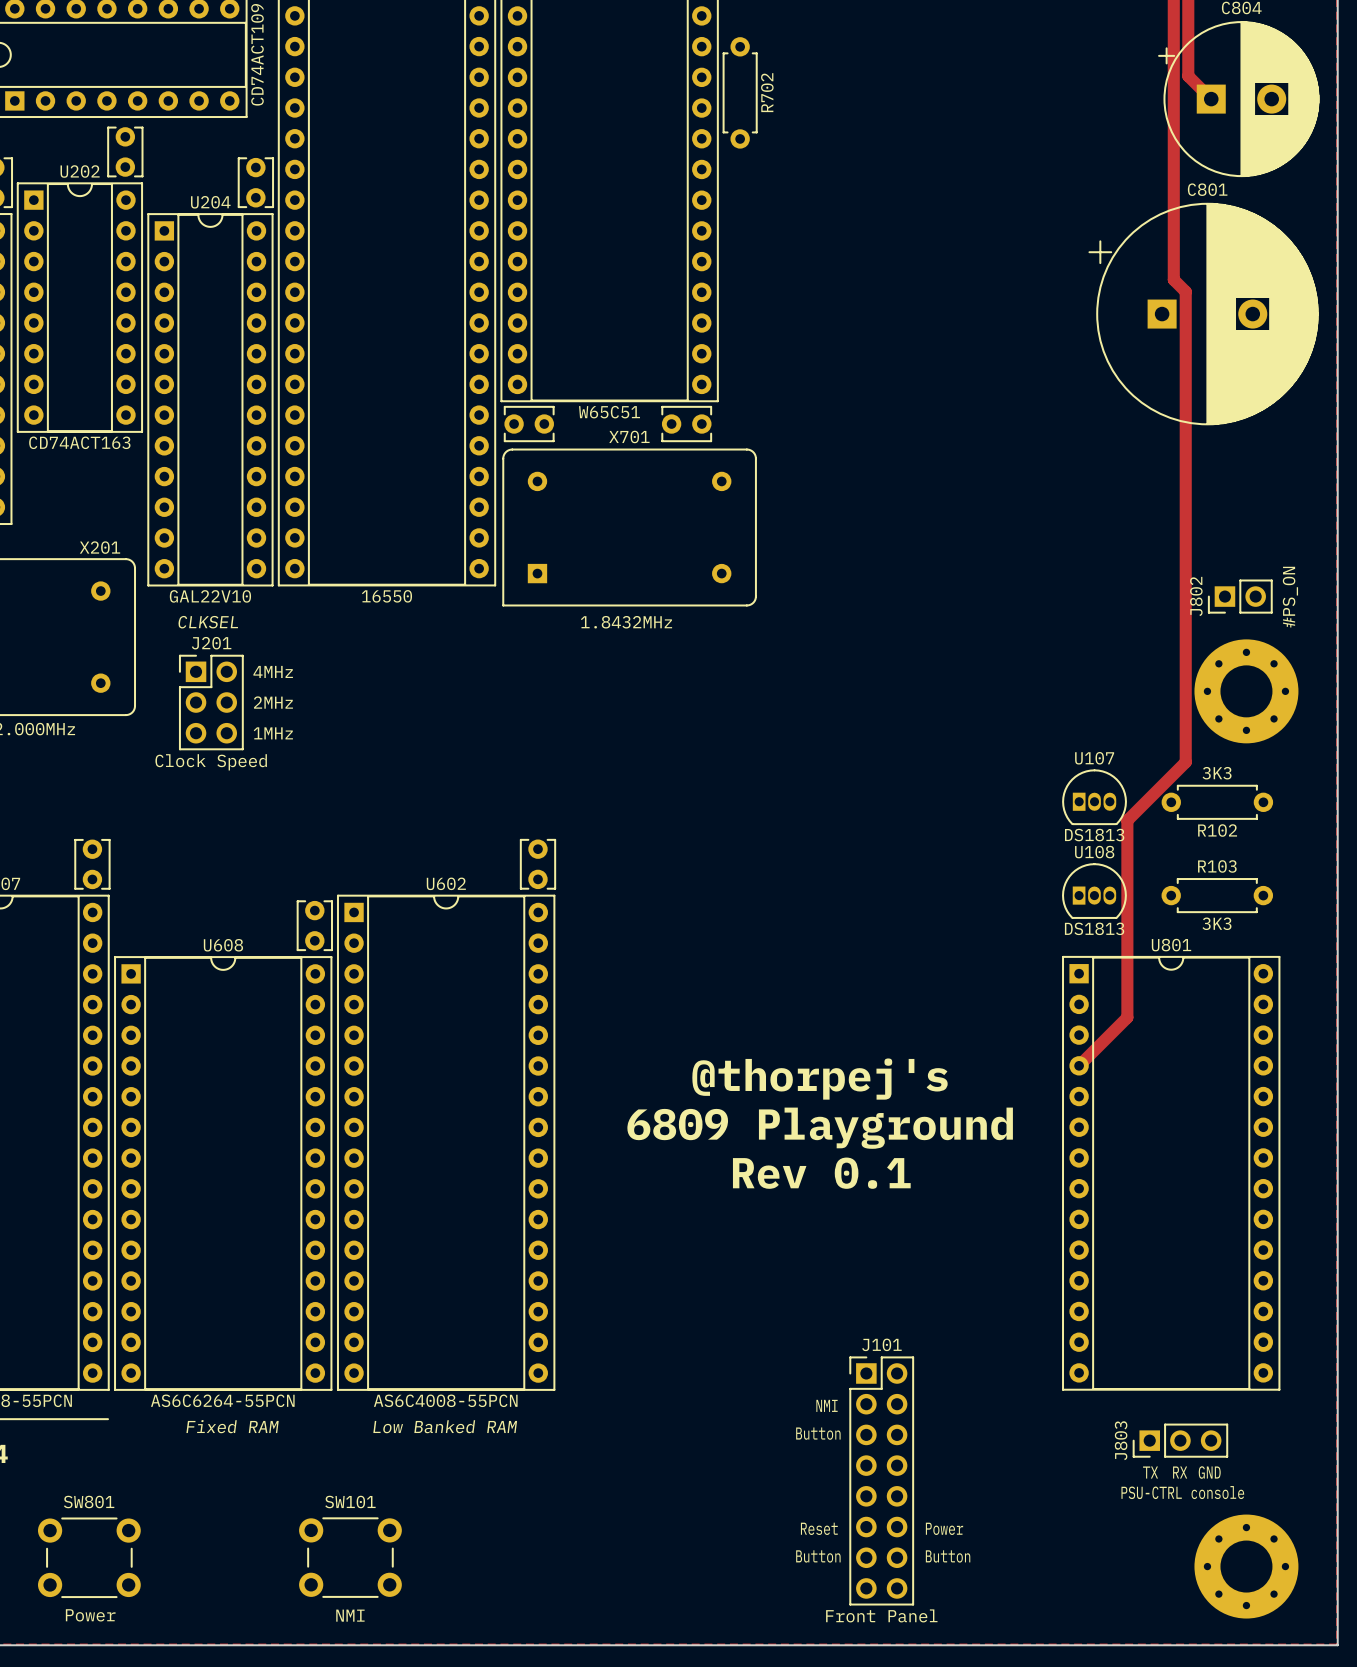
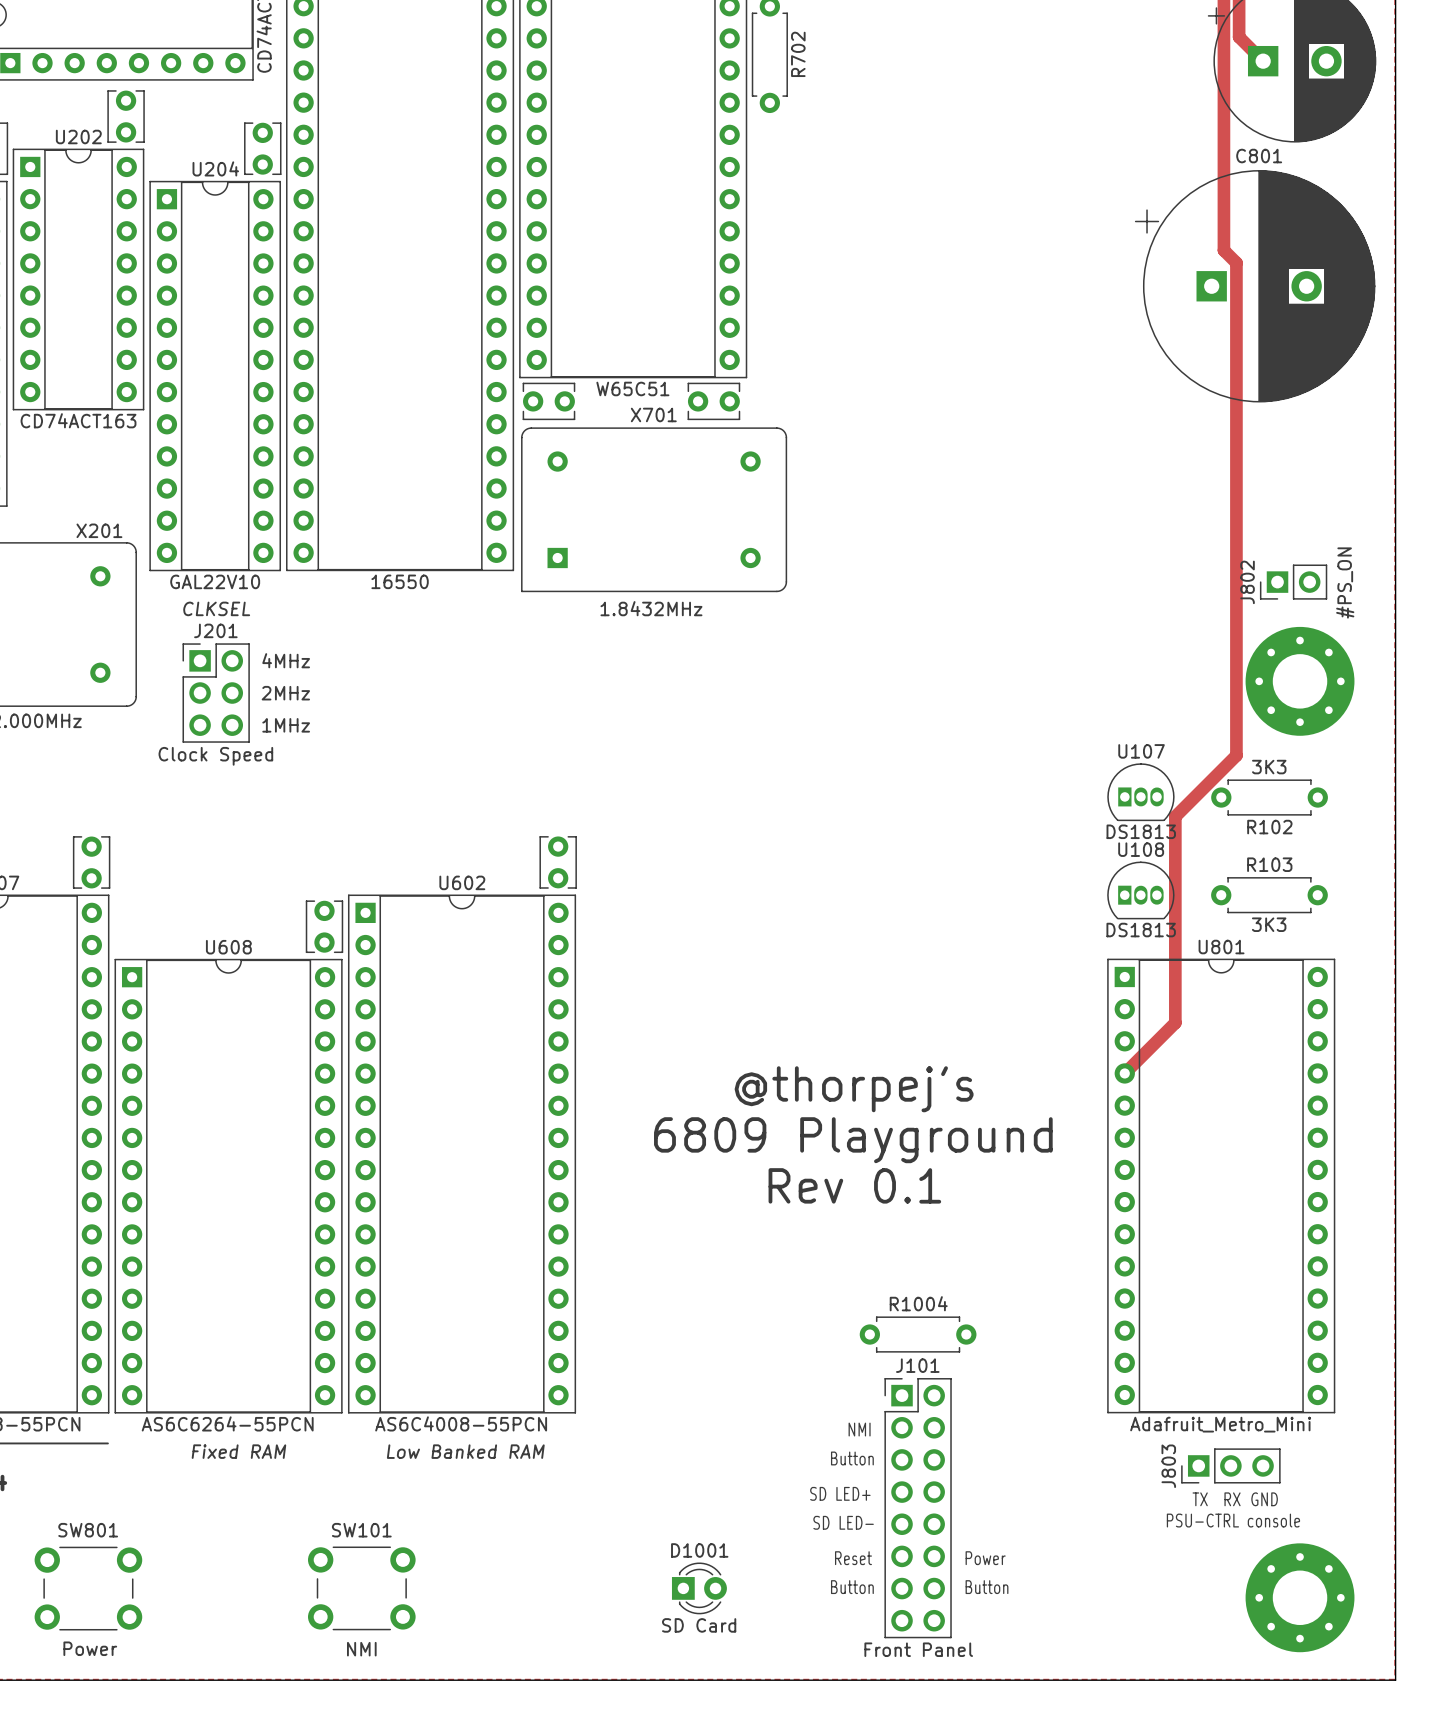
R1004: none -> (918, 1334)
U801 value: none -> Adafruit_Metro_Mini (1220, 1424)
text: none -> SD LED+ (840, 1493)
text: none -> SD LED- (843, 1522)
D1001: none -> SD Card (699, 1588)

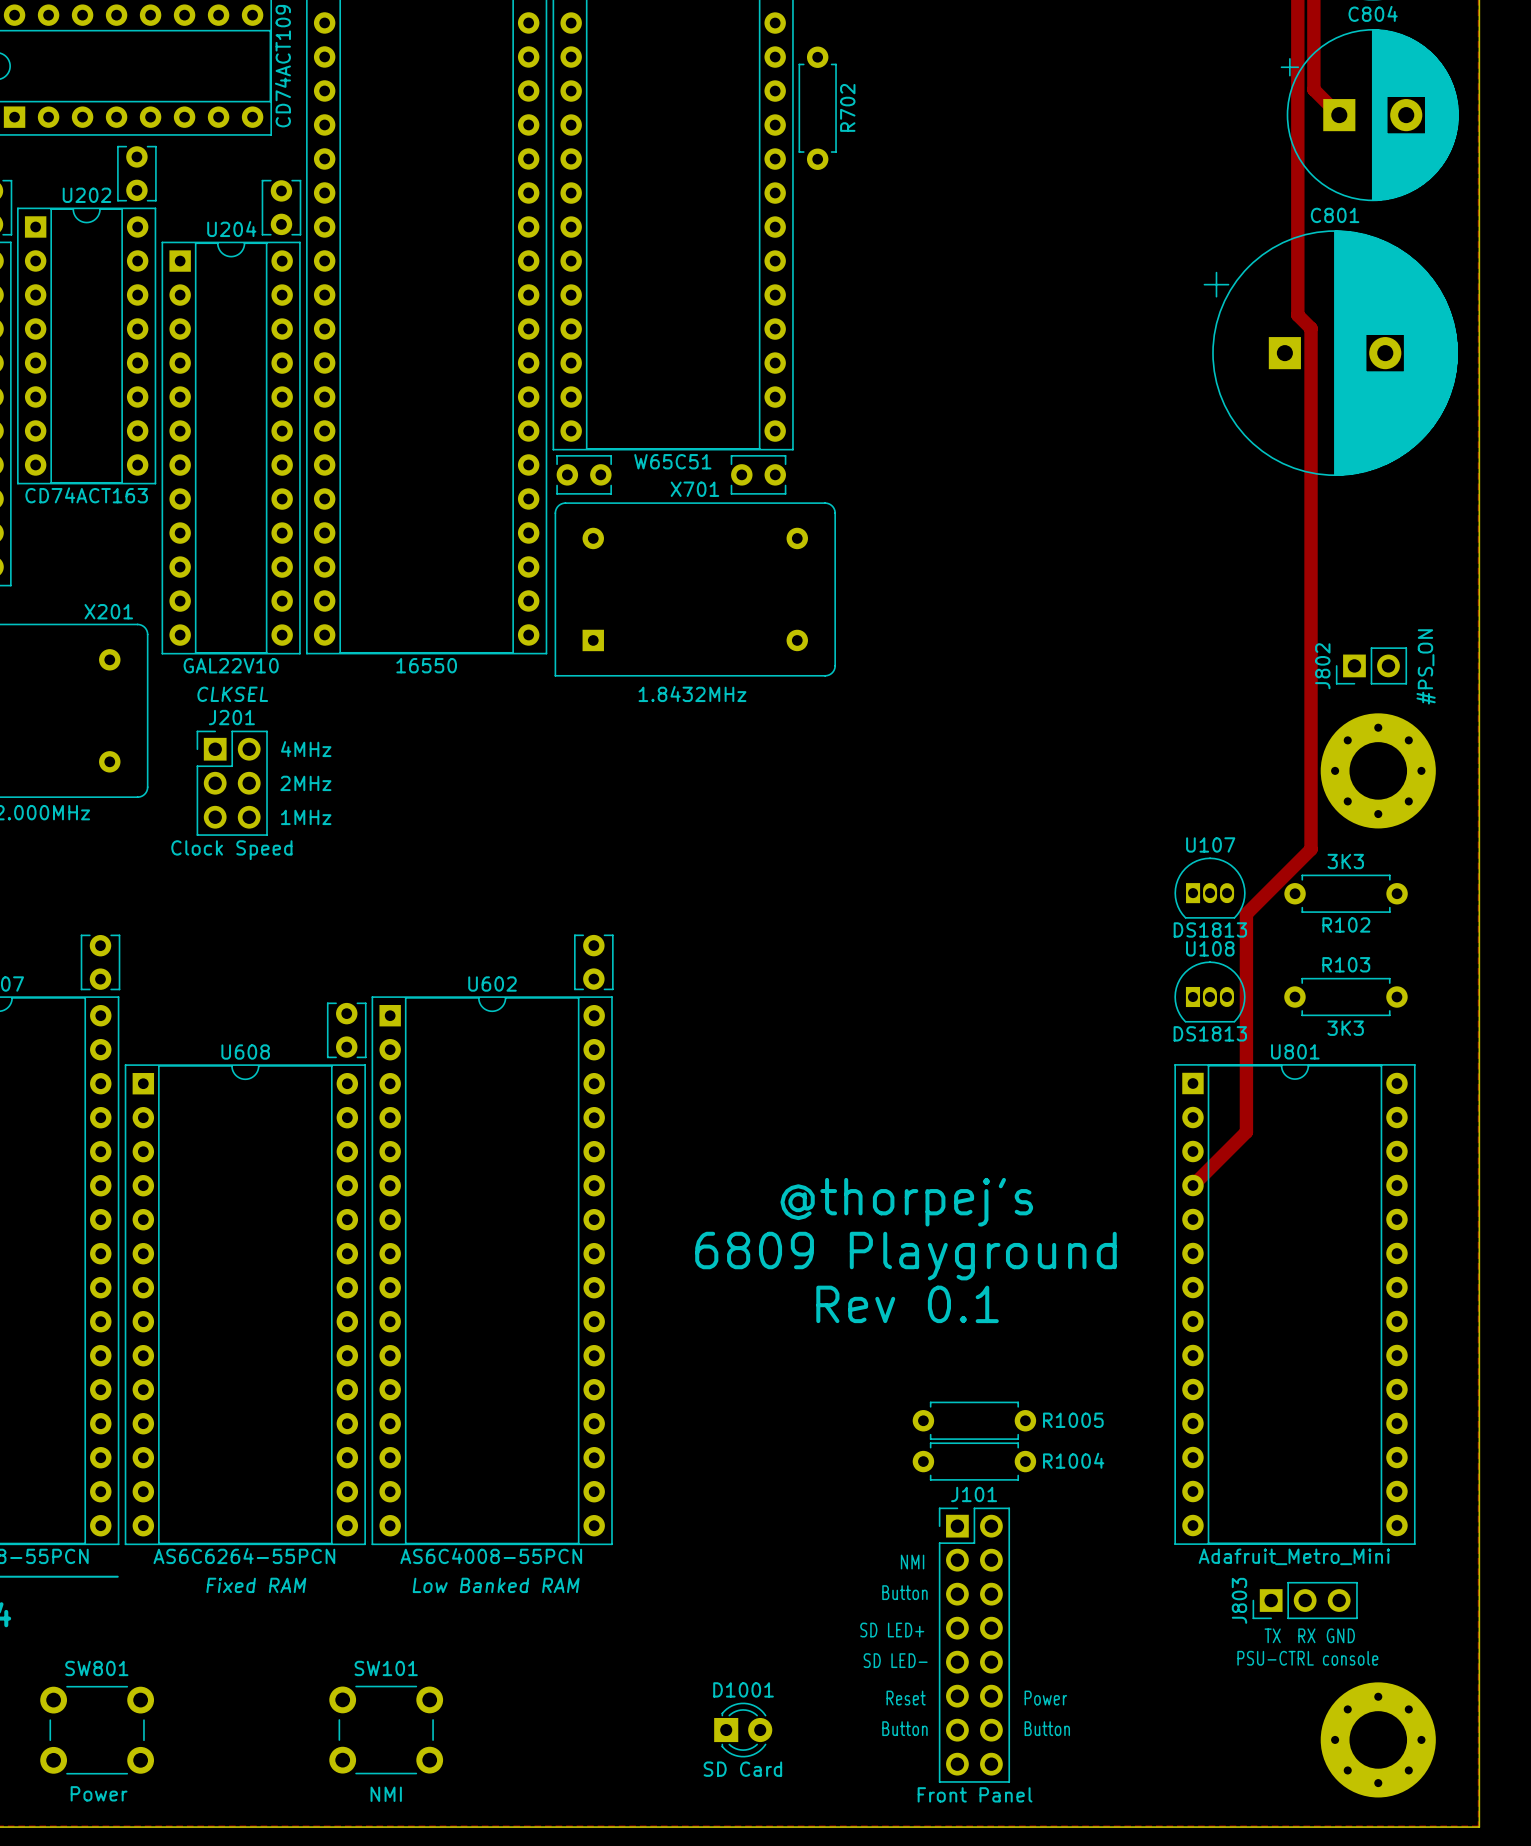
R1005: none -> (974, 1420)
R1004 name position: R1004 (918, 1303) -> R1004 (1073, 1460)

